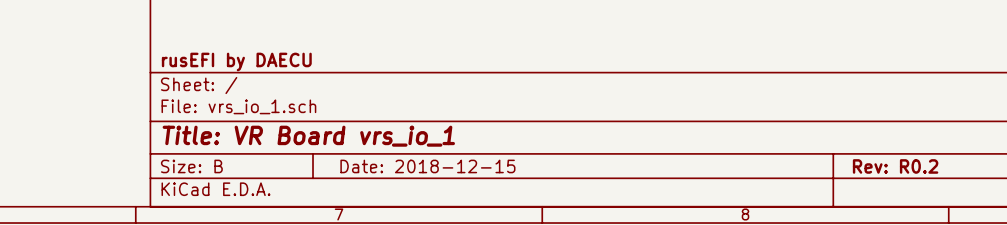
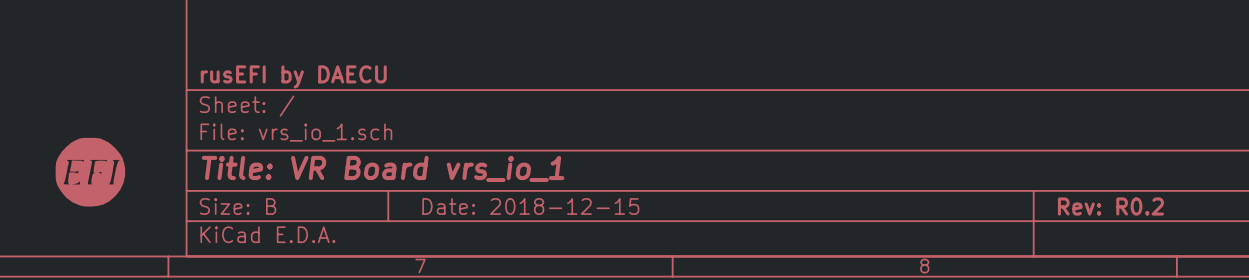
power symbol: none -> (90, 172)

